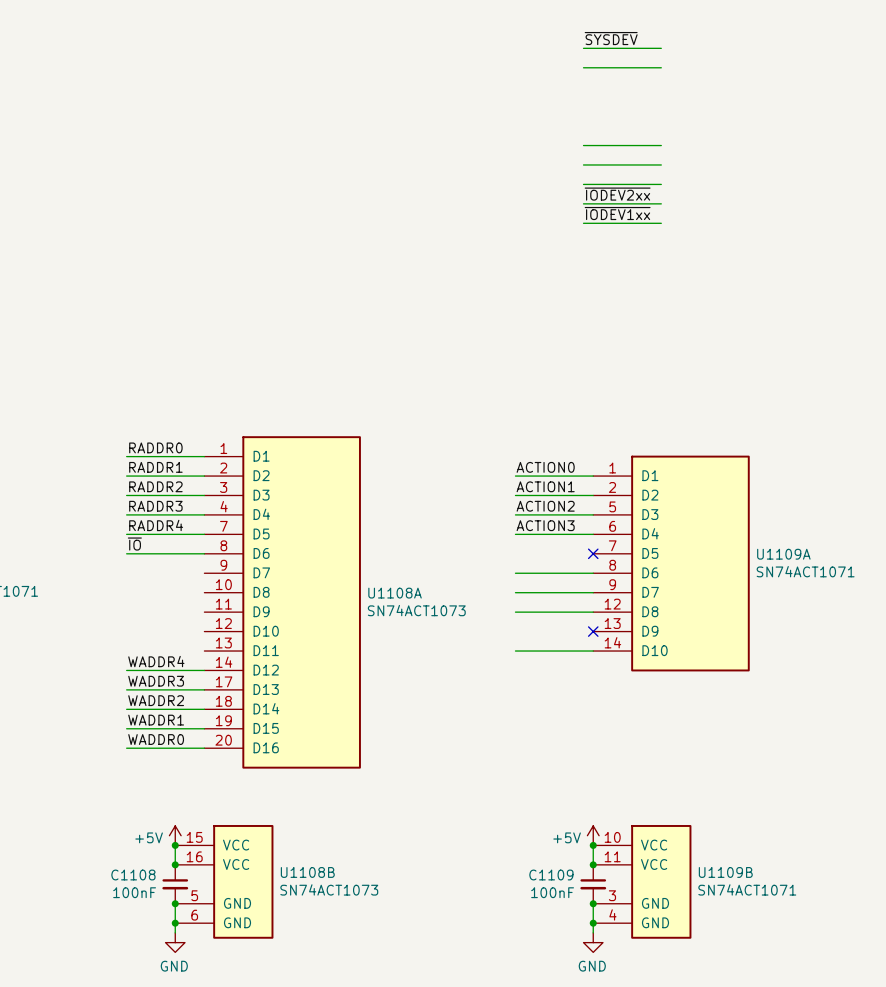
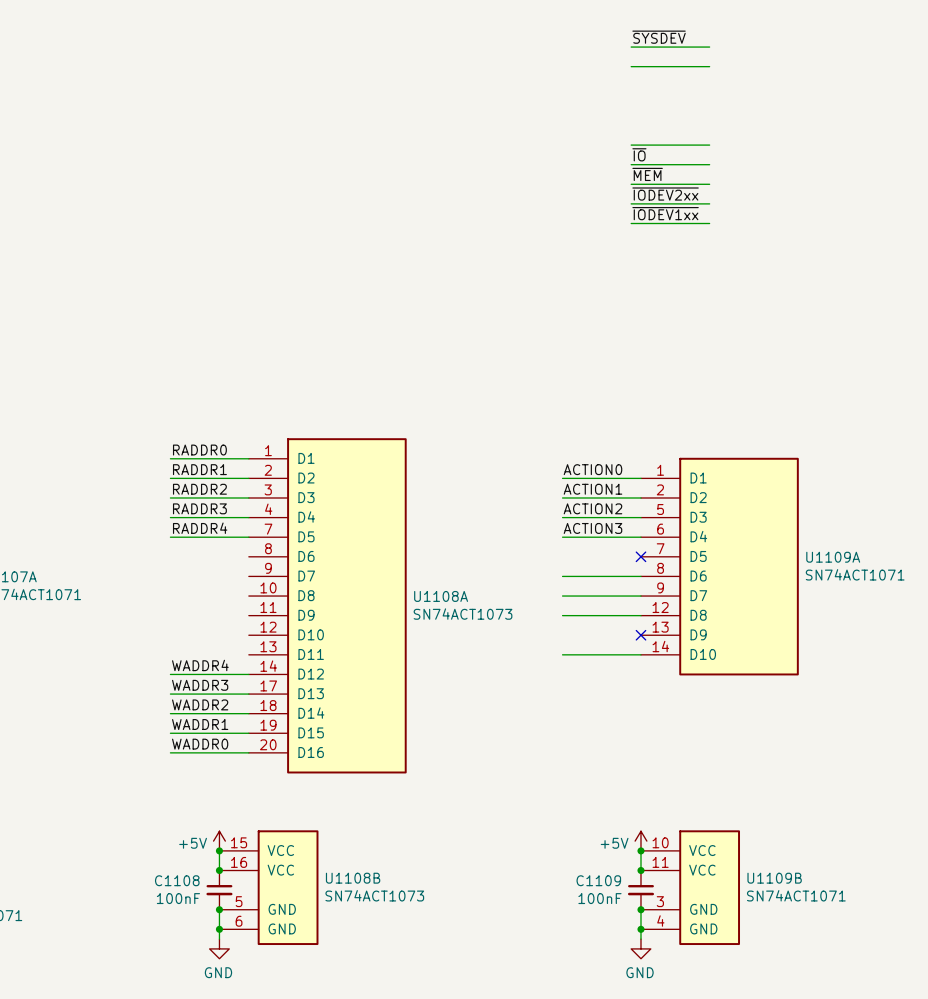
label: none -> ~{IO} (639, 154)
label: none -> ~{MEM} (647, 174)
label: ~{IO} (134, 544) -> none
wire: (126, 553) (204, 553) -> none

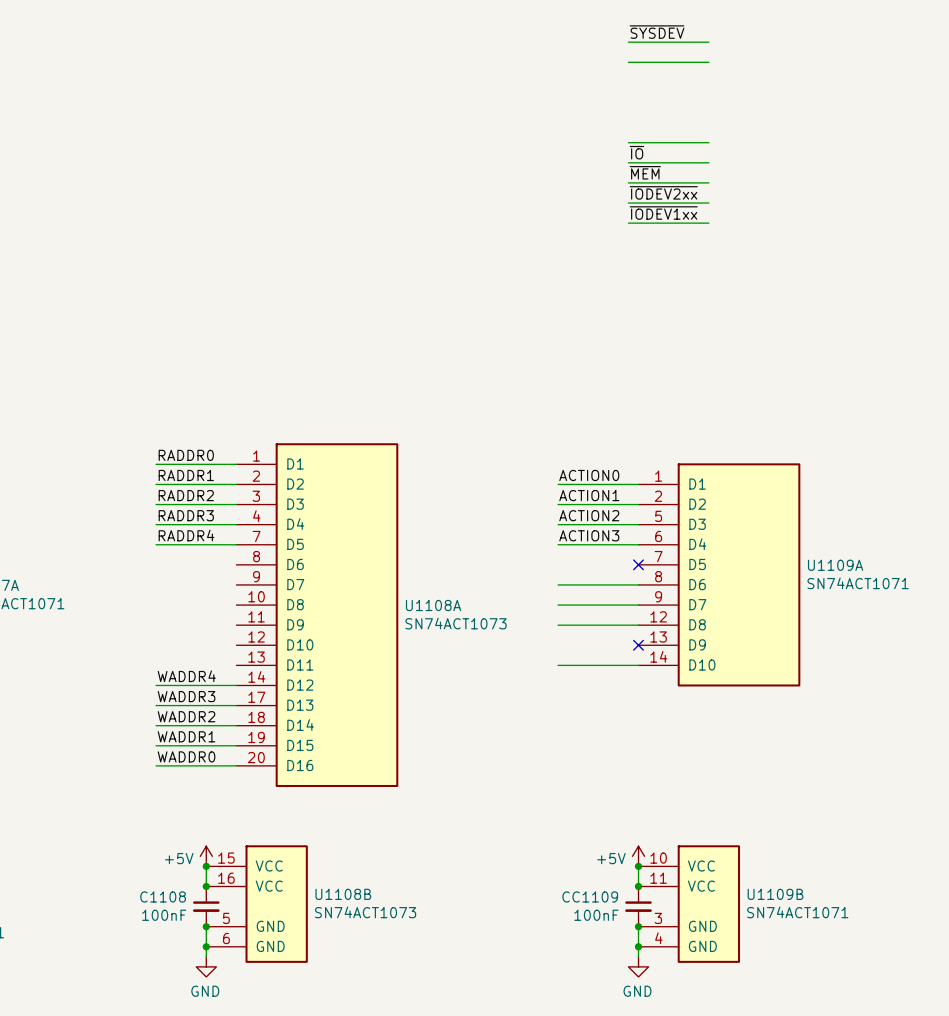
C1109 name: C1109 (598, 880) -> CC1109 (590, 896)

